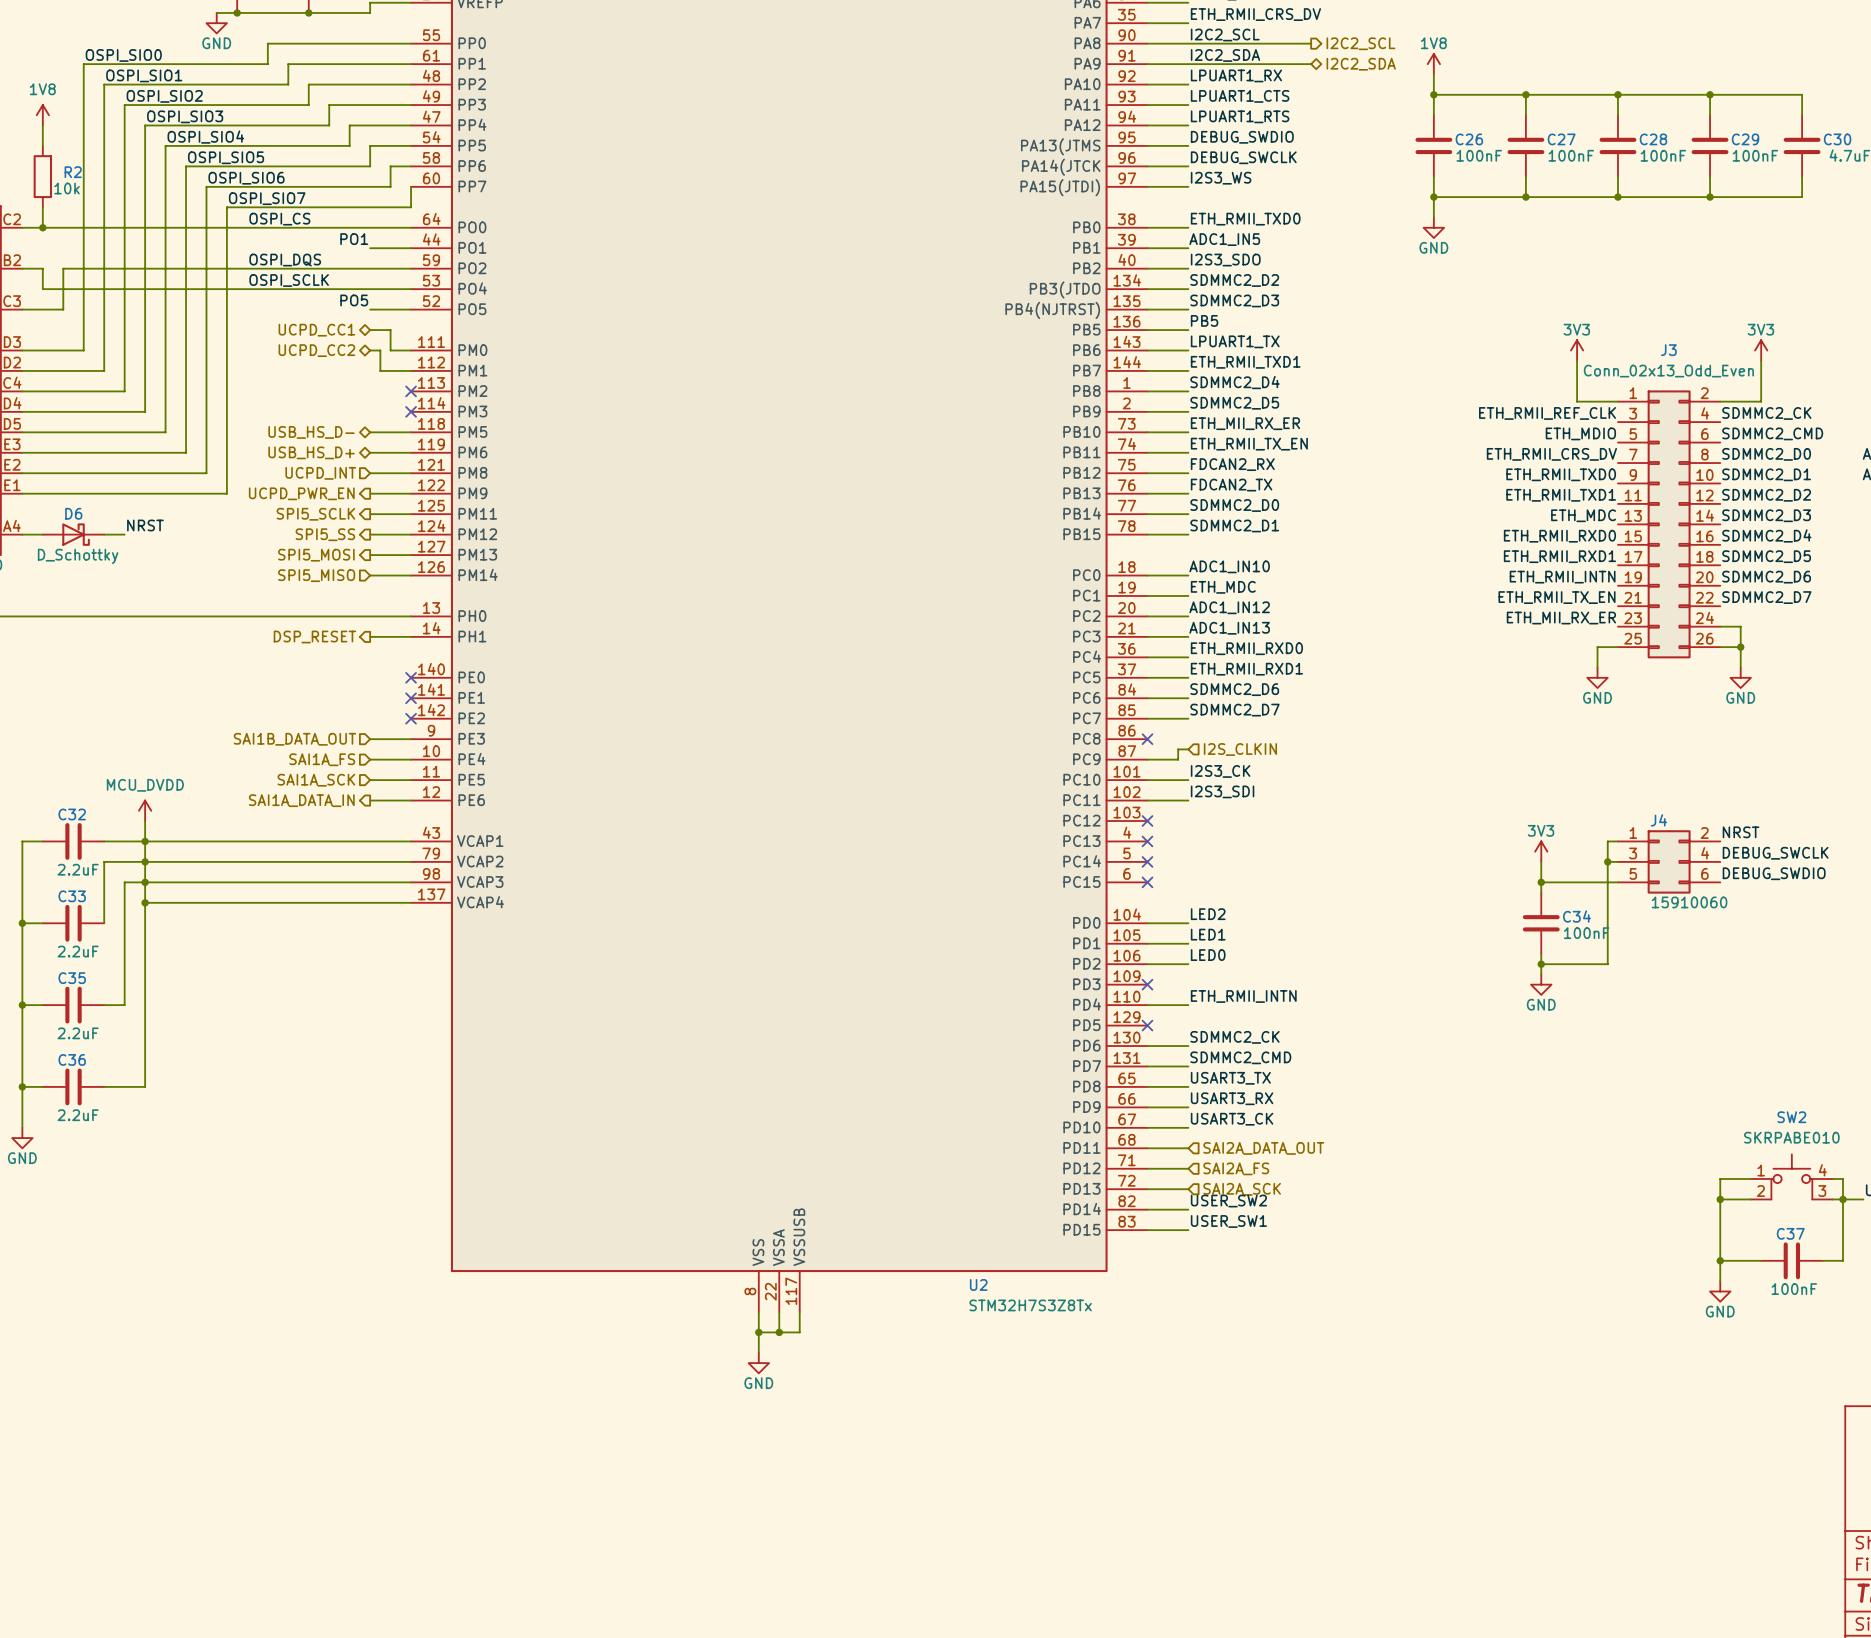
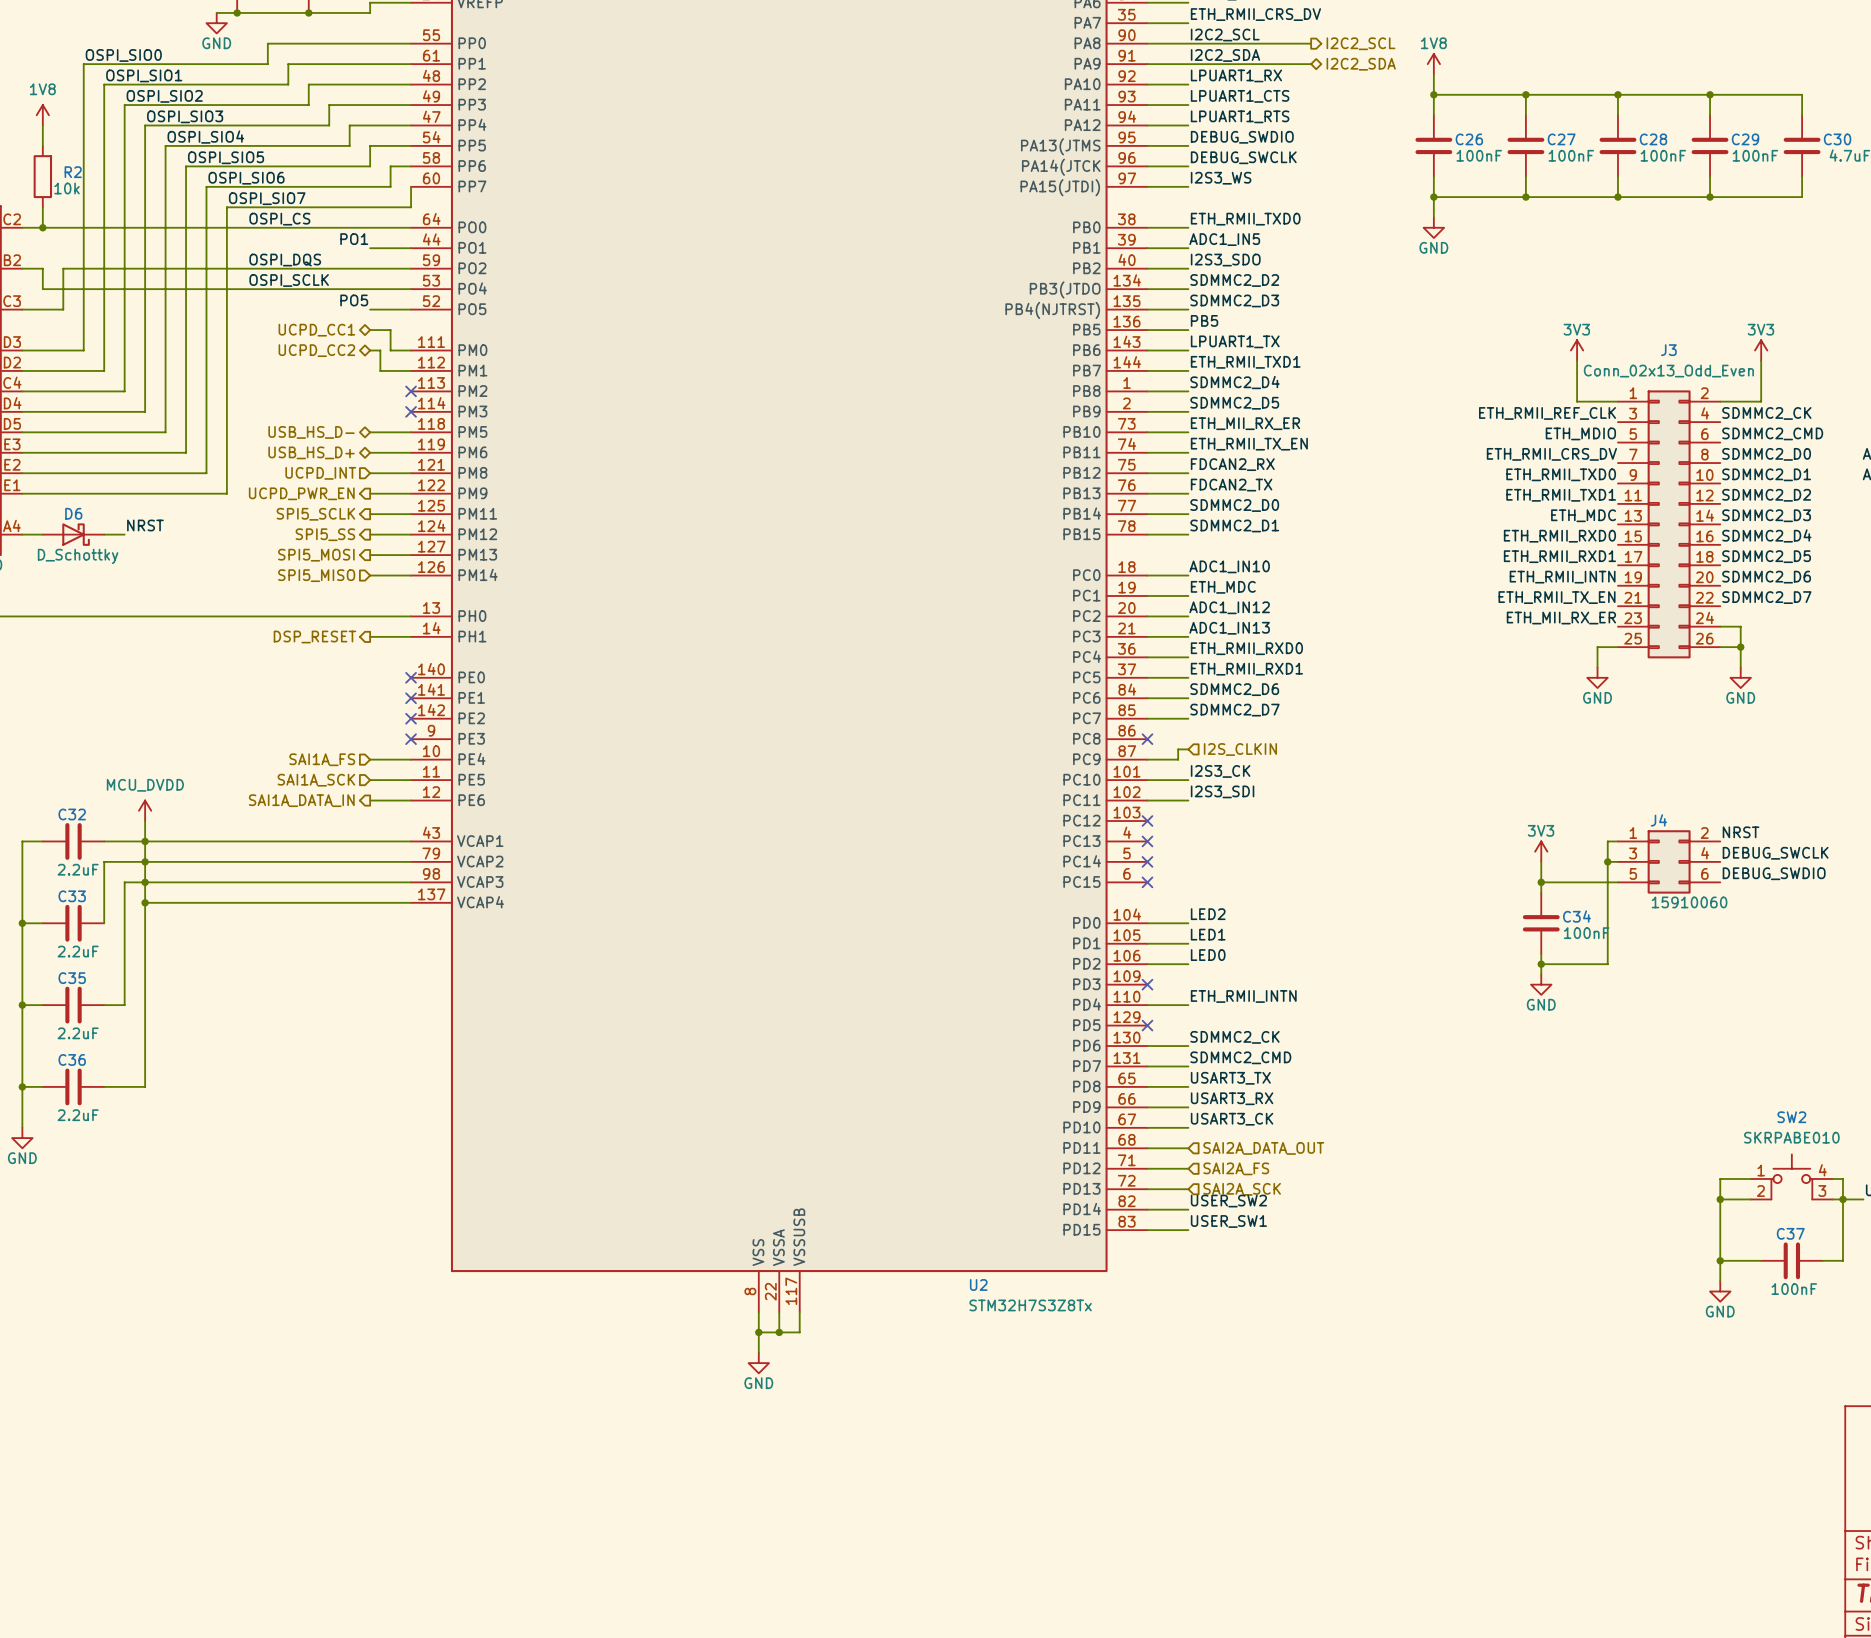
hierarchical label: SAI1B_DATA_OUT (294, 739) -> none
wire: (370, 739) (411, 739) -> none
no-connect mark: none -> (411, 739)

